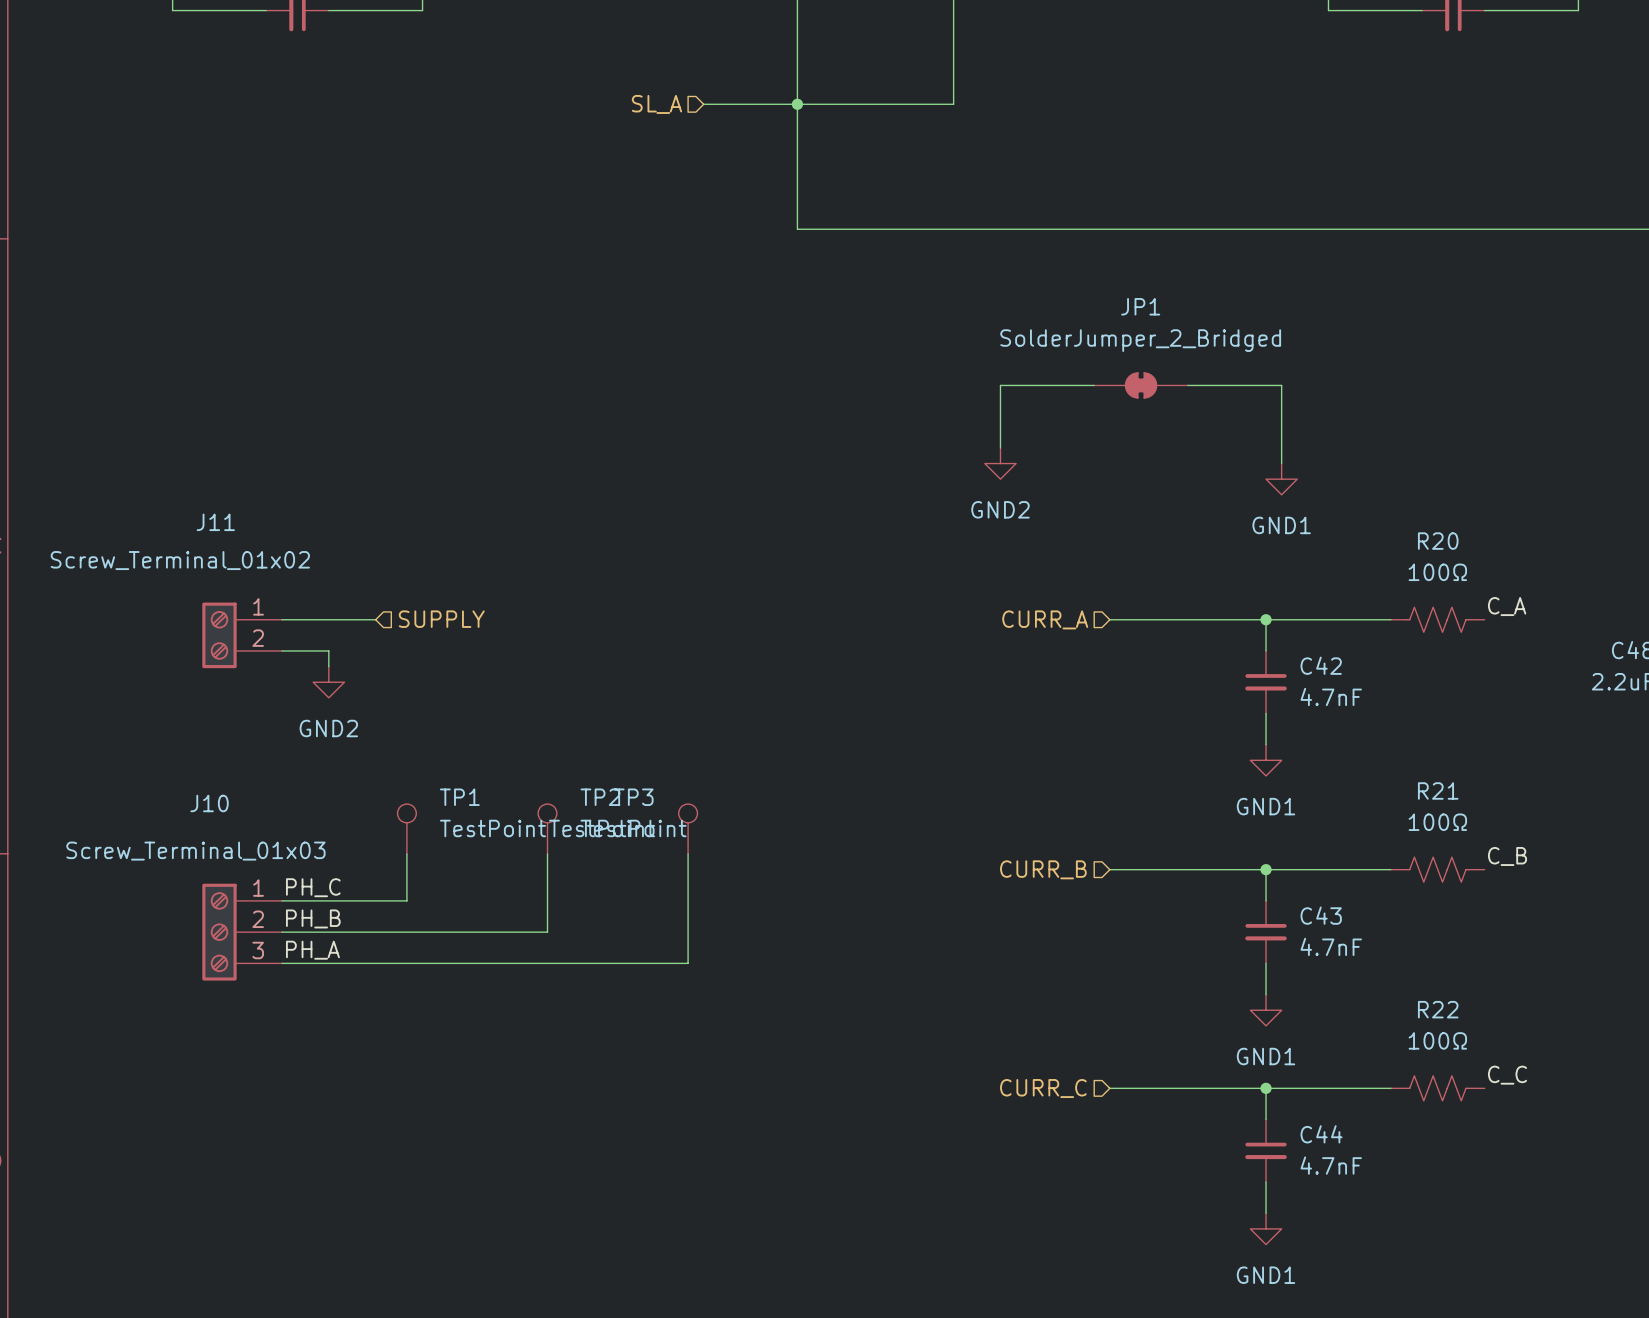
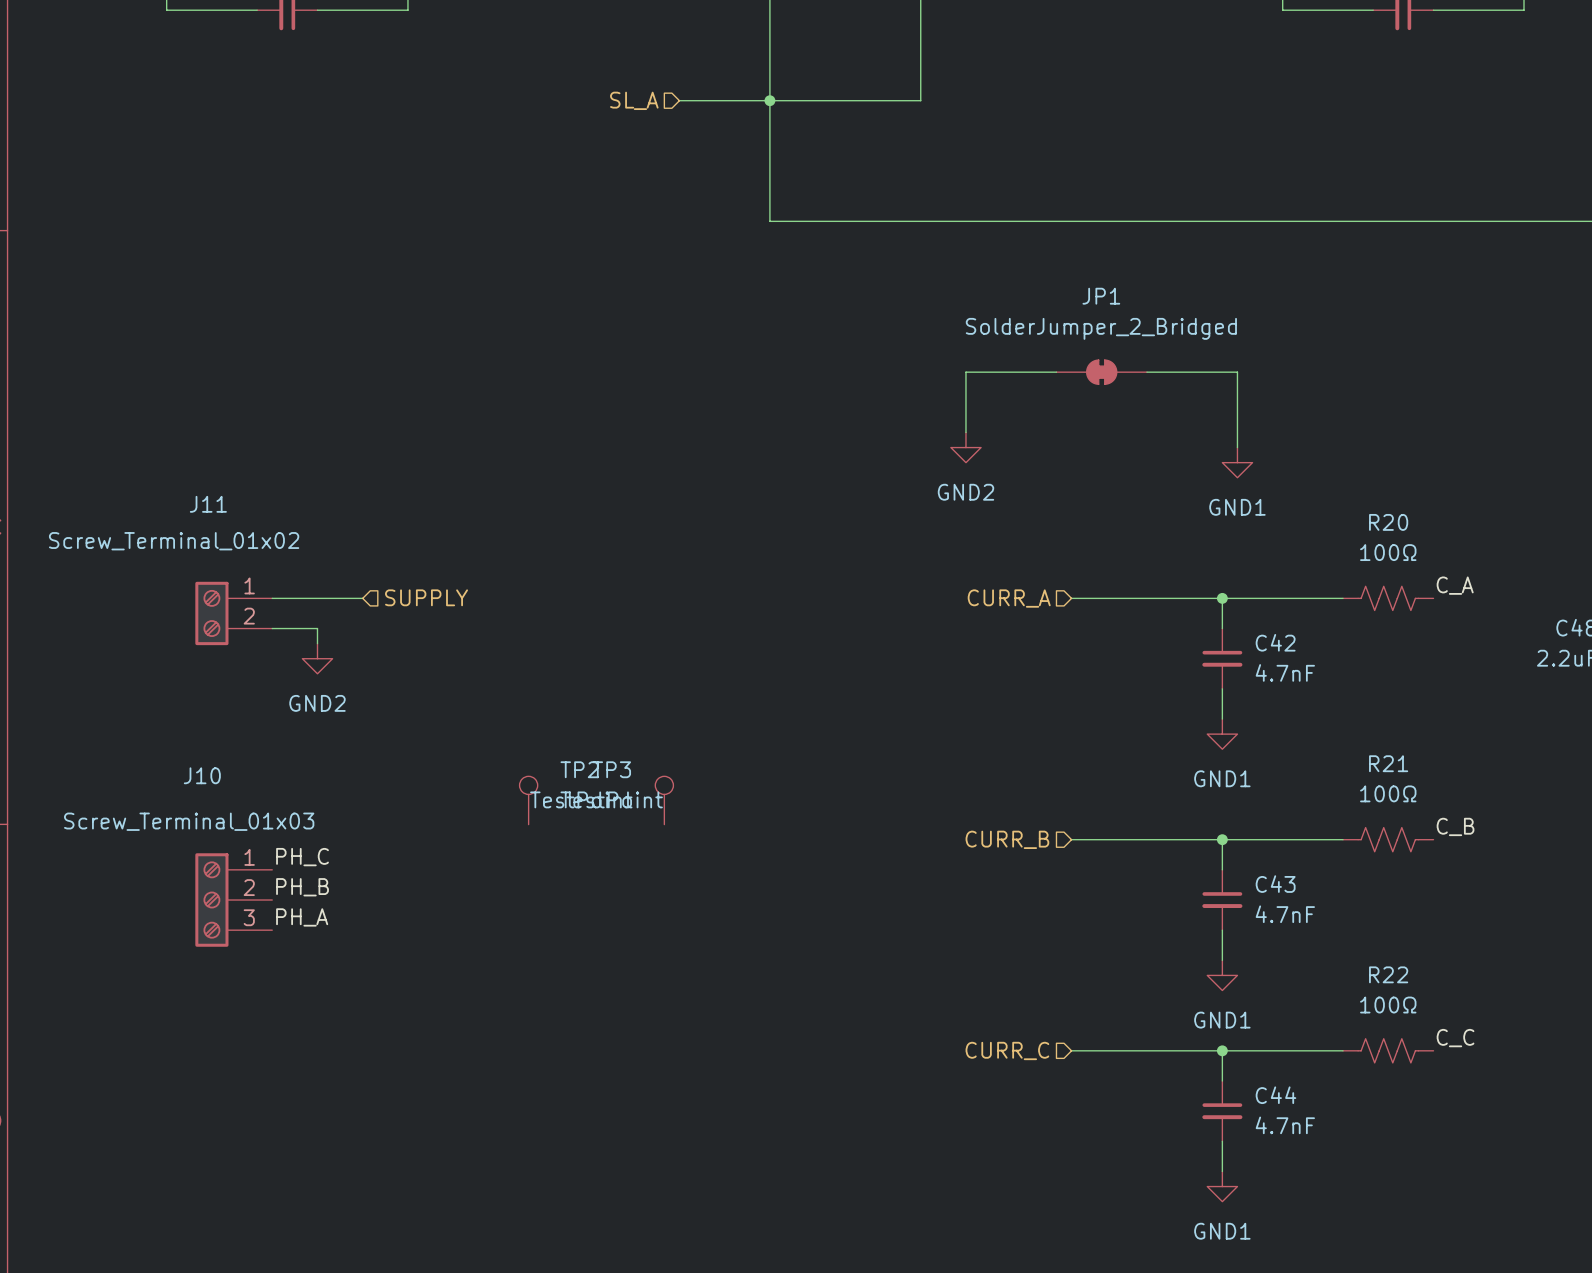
TP1: TestPoint (406, 829) -> none
wire: (406, 854) (406, 900) (281, 900) -> none
wire: (547, 854) (547, 932) (281, 932) -> none
wire: (688, 854) (688, 963) (281, 963) -> none

